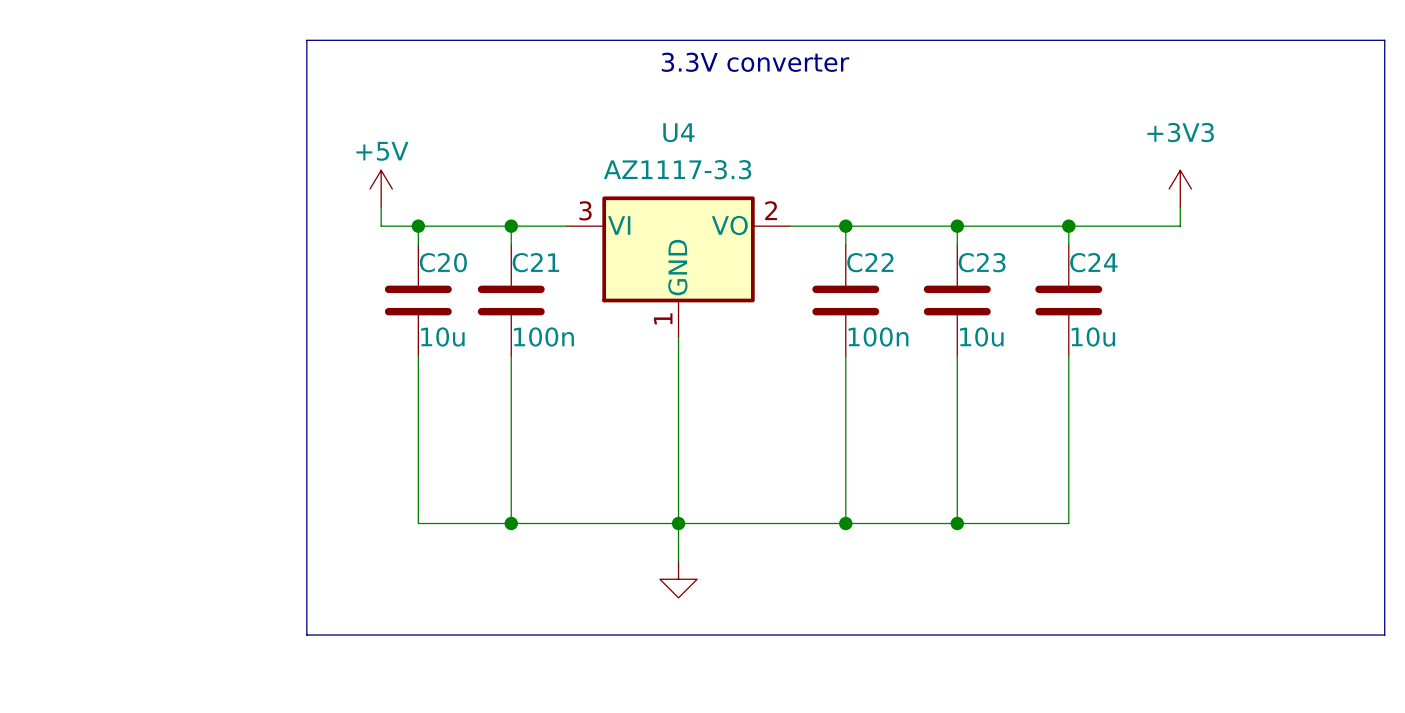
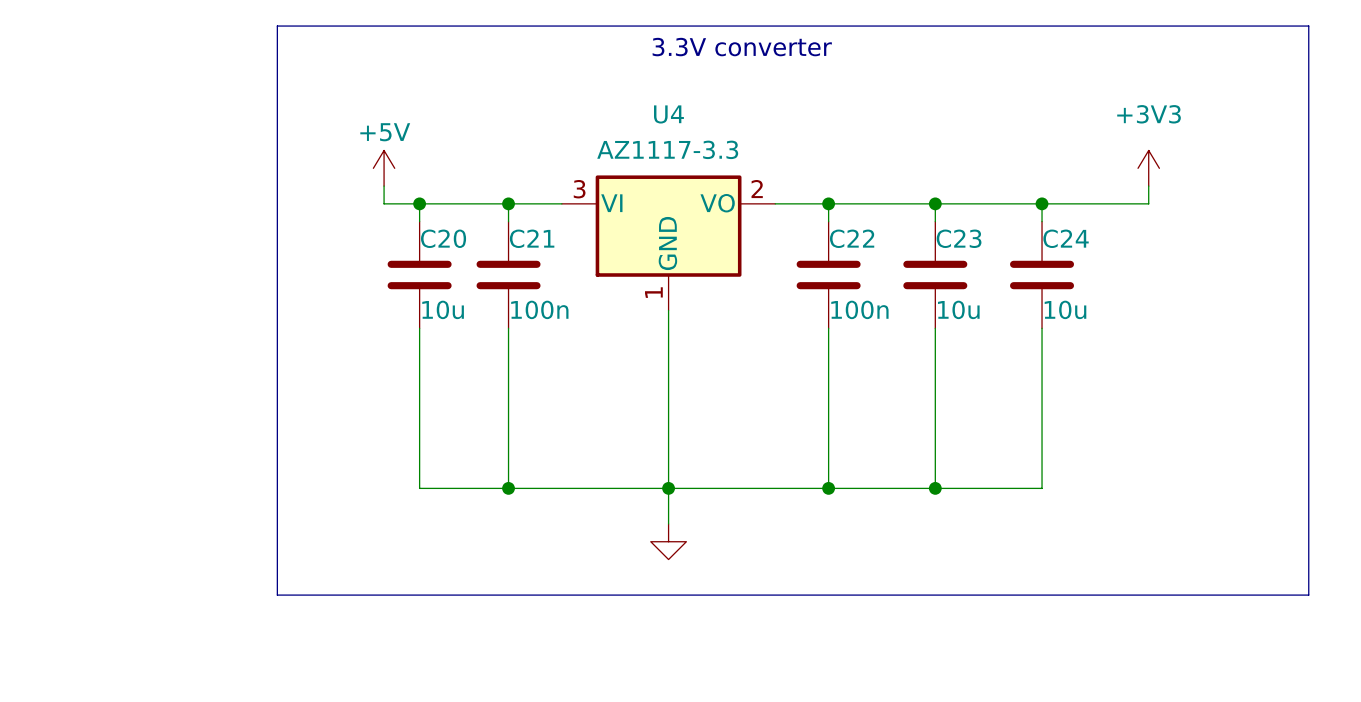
line: (306, 40) (306, 635) -> (312, 26) (277, 26) (277, 595) (312, 595)
line: (1347, 40) (1384, 40) (1384, 635) (1347, 635) -> (1308, 26) (1308, 595)

